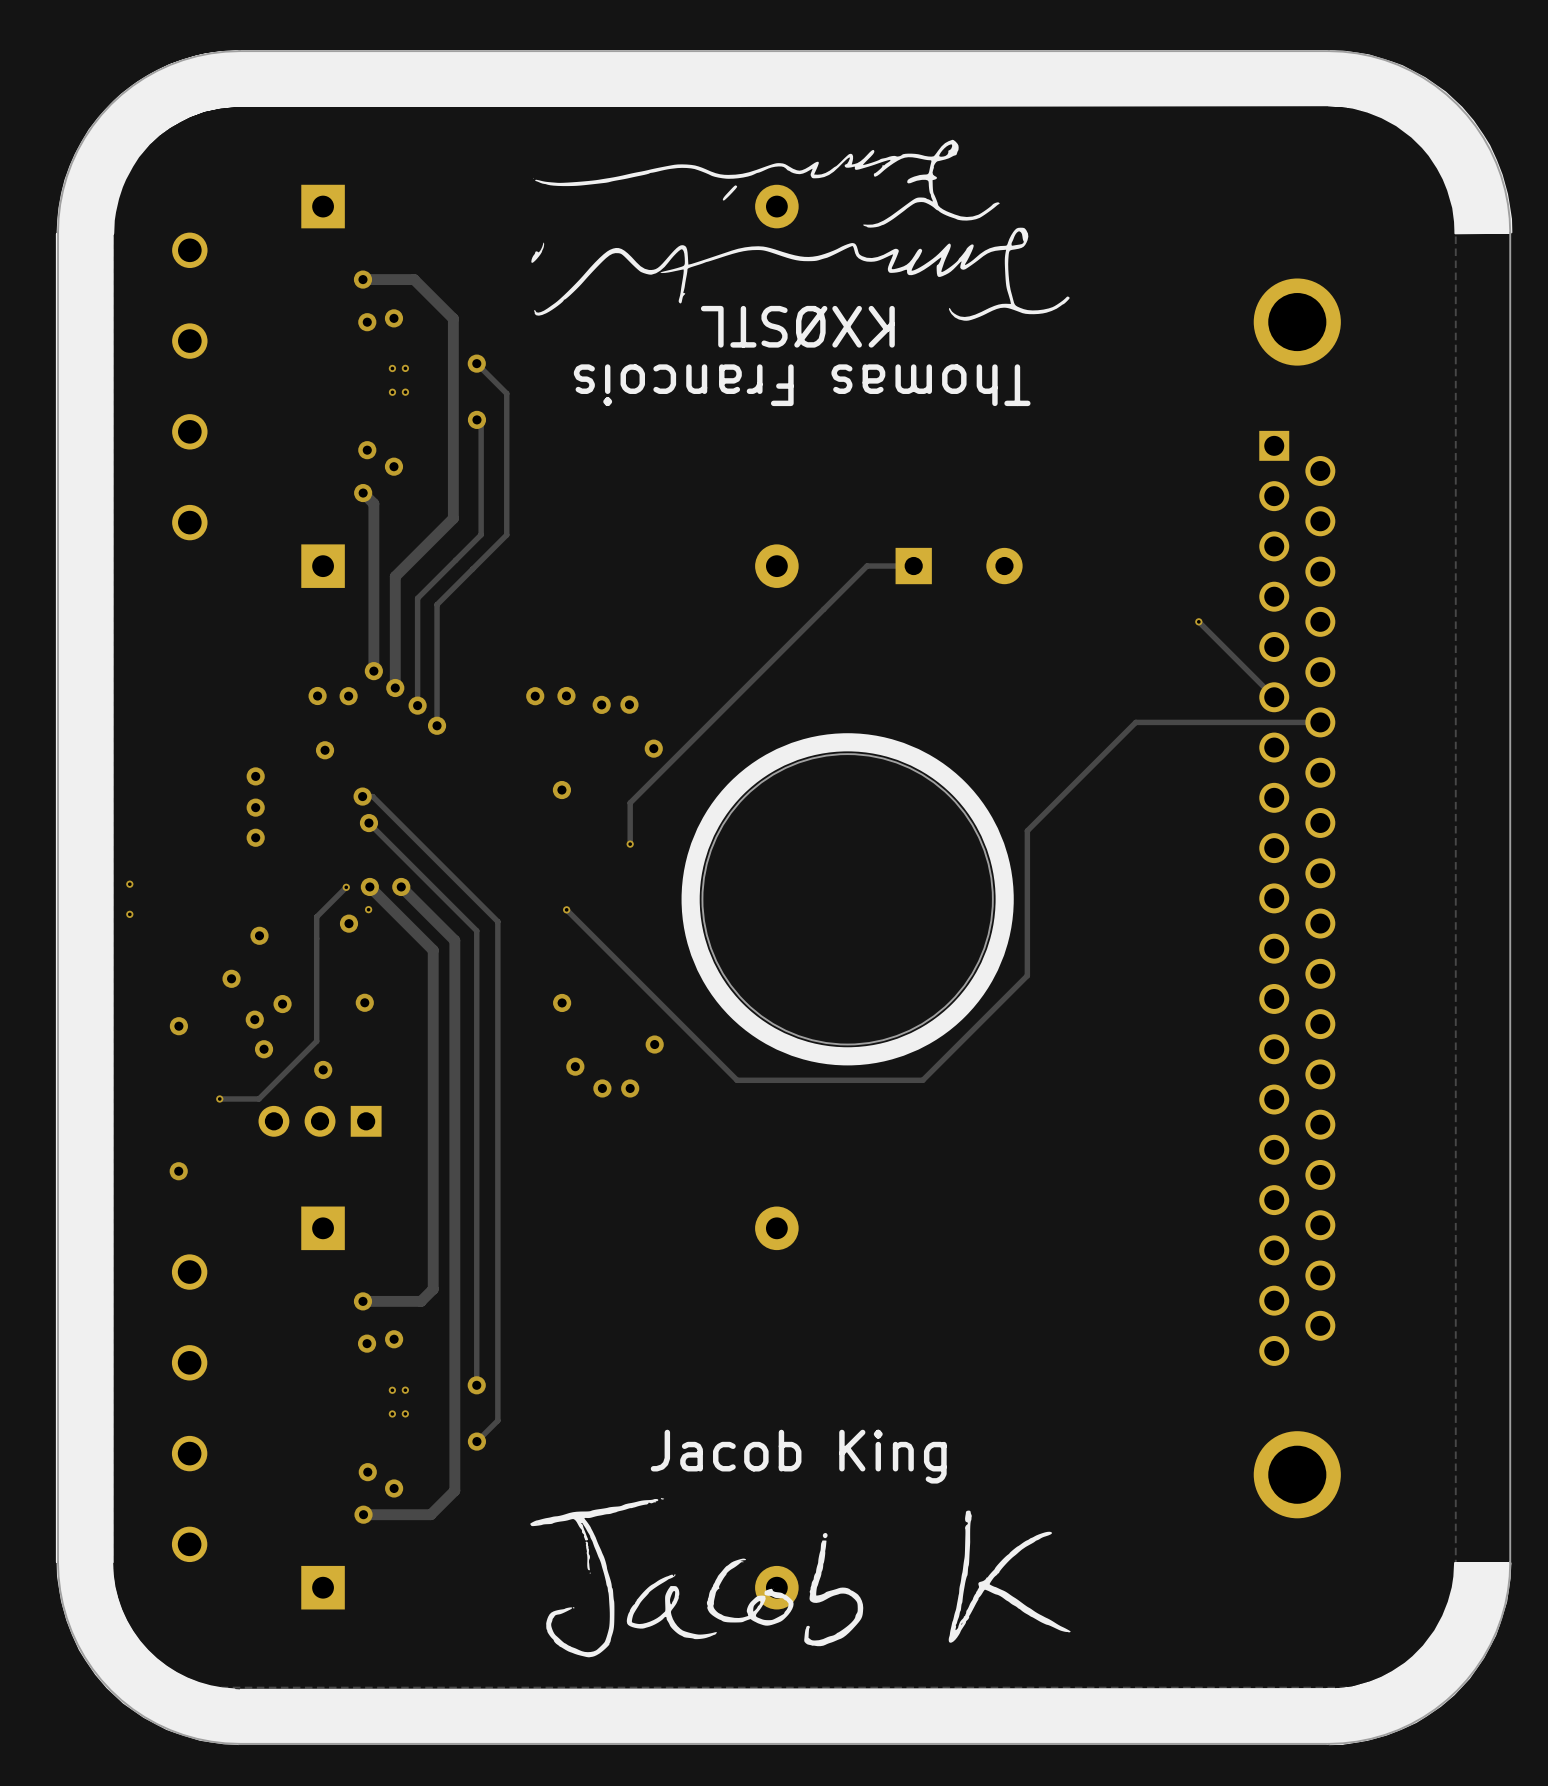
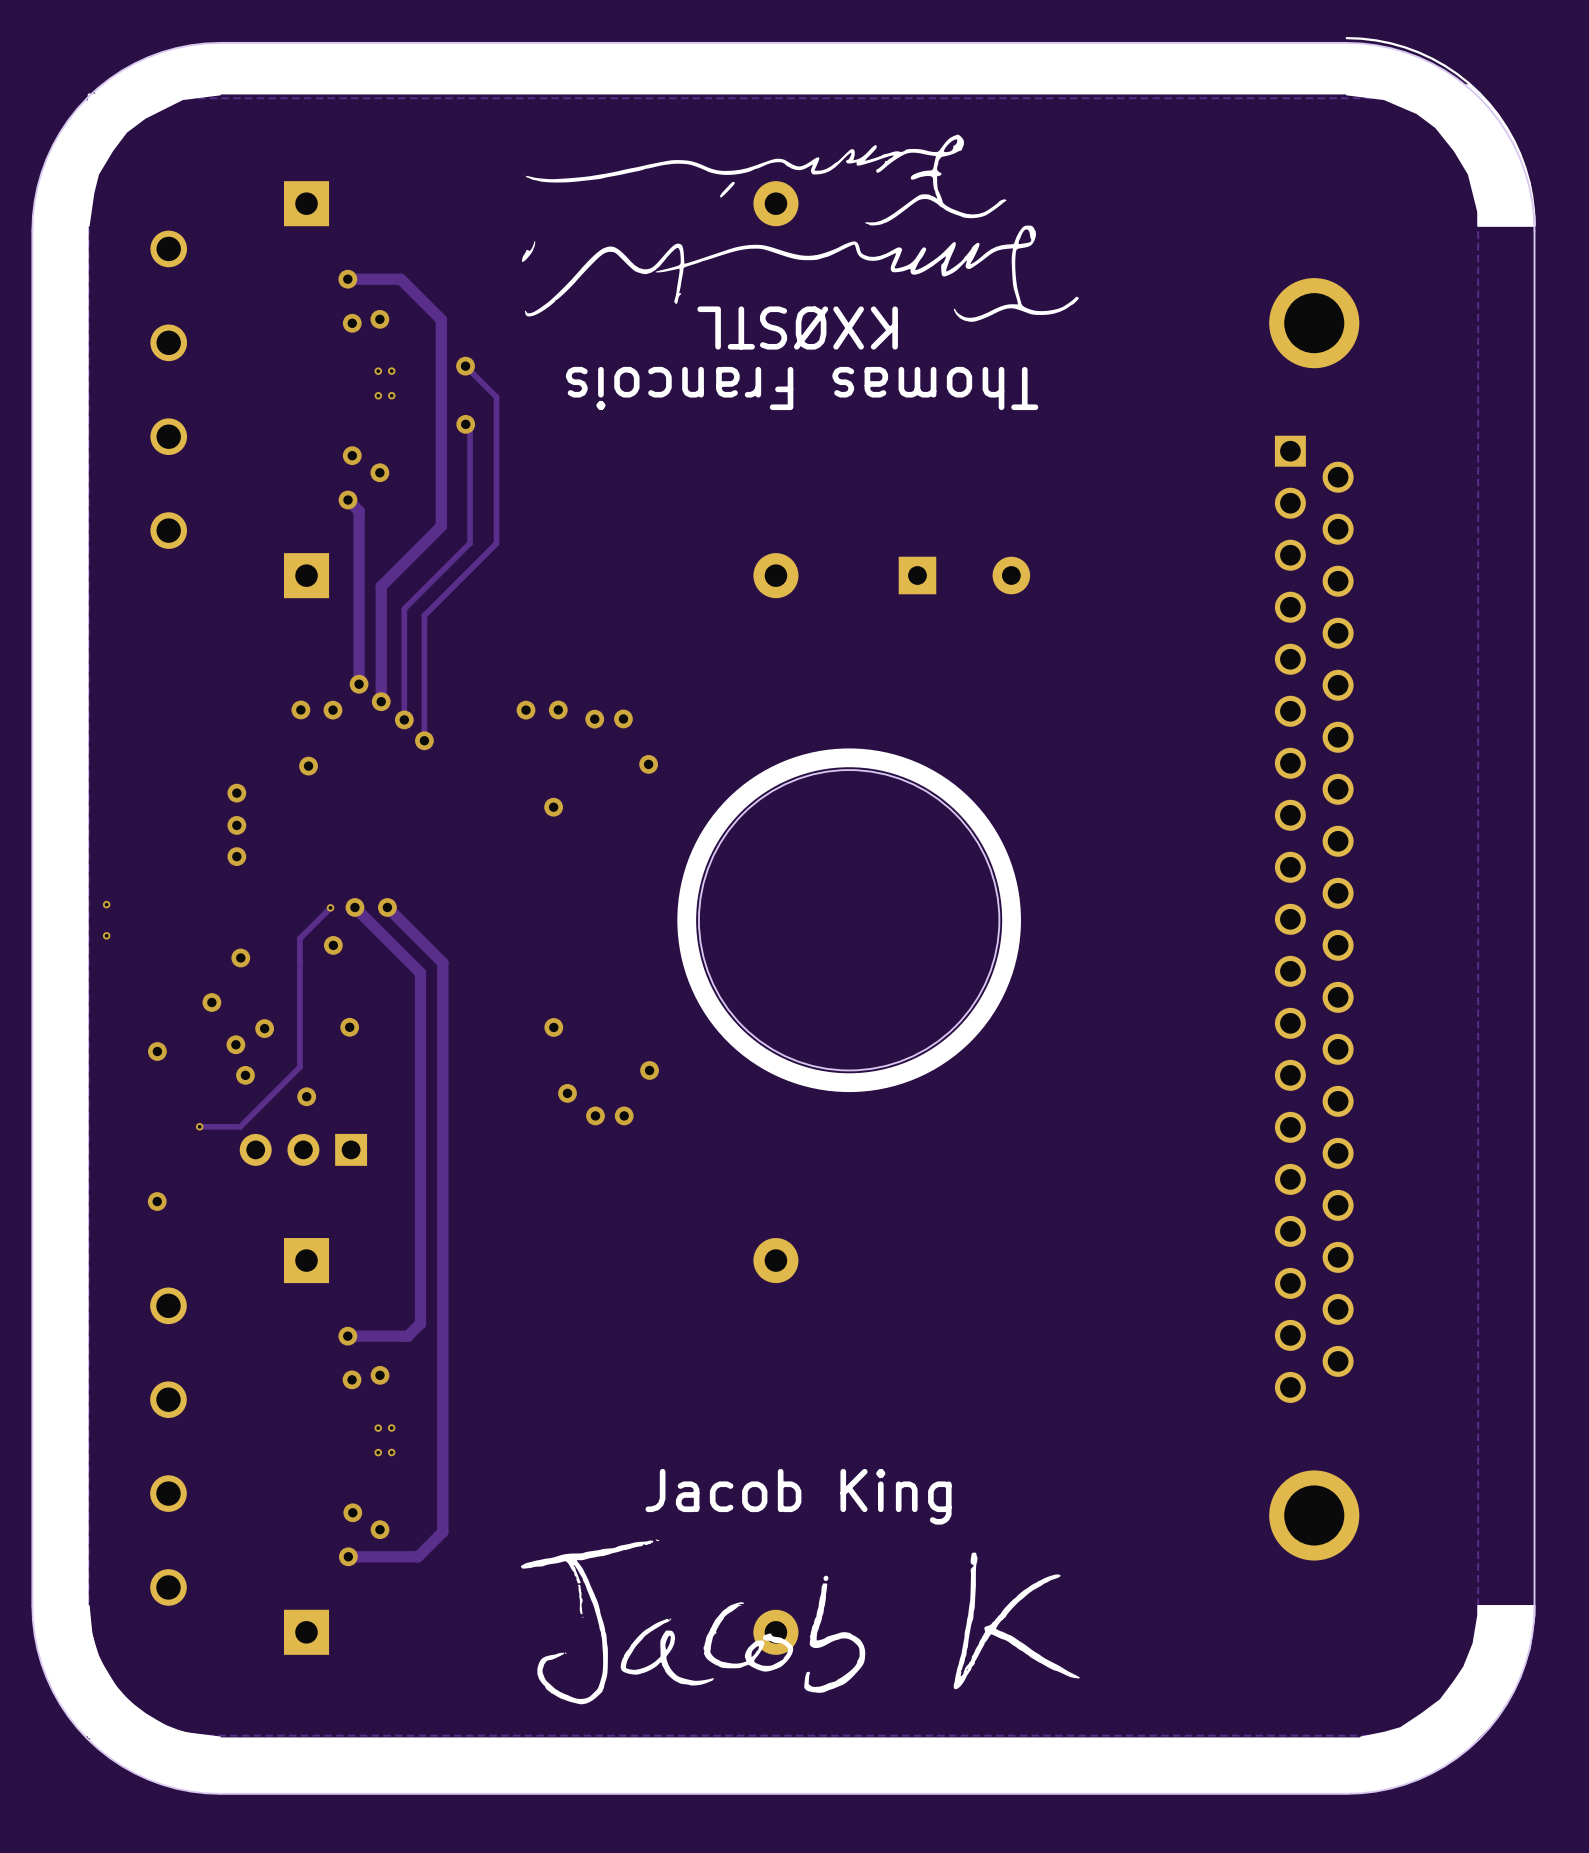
line: none -> (1346, 38) (1376, 40) (1418, 52) (1444, 65) (1479, 93) (1498, 115) (1520, 154) (1529, 182) (1534, 225)
drawing: [55, 50, 1513, 1746] -> none
drawing: none -> [32, 42, 1536, 1739]
track: (913, 566) (867, 566) (630, 802) (630, 844) -> none
track: (1198, 621) (1274, 697) -> none
via: (1198, 621) -> none
track: (1320, 722) (1135, 722) (1027, 830) (1027, 975) (922, 1080) (737, 1080) (566, 909) -> none
track: (362, 796) (372, 796) (497, 921) (497, 1420) (476, 1441) -> none
via: (362, 796) -> none
track: (368, 823) (476, 930) (476, 1385) -> none
via: (368, 823) -> none
via: (630, 844) -> none
via: (368, 909) -> none
via: (566, 909) -> none
via: (476, 1385) -> none
via: (476, 1441) -> none
drawing: [1326, 1561, 1512, 1746] -> none
drawing: none -> [1359, 1605, 1536, 1748]
drawing shape: [239, 1688, 1335, 1745] -> [89, 1737, 1478, 1794]

